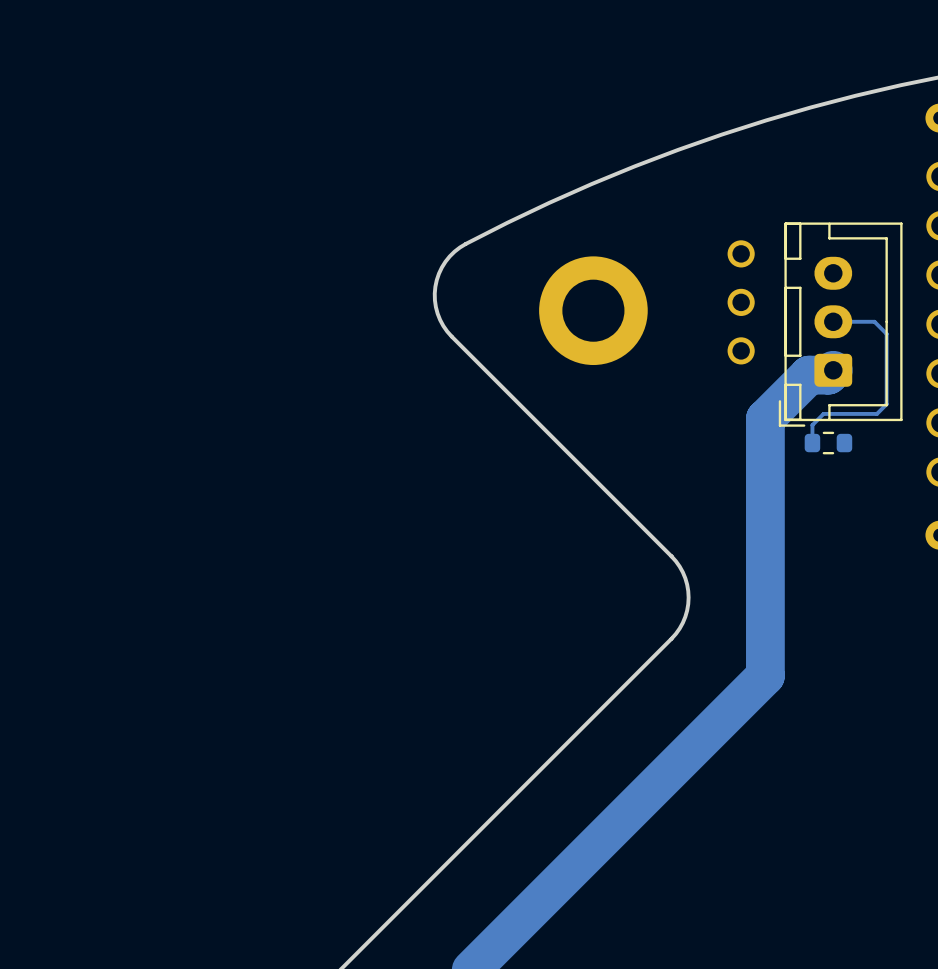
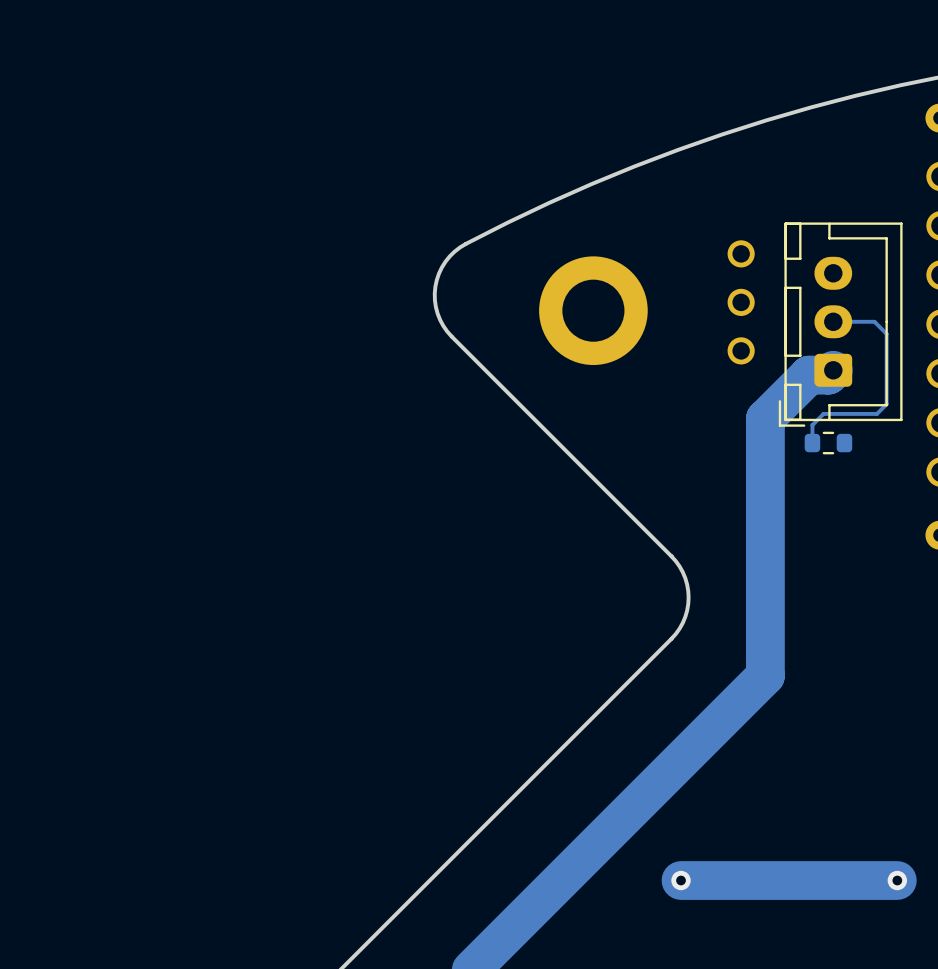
via: none -> (681, 880)
track: none -> (897, 880) (681, 880)
via: none -> (897, 880)

